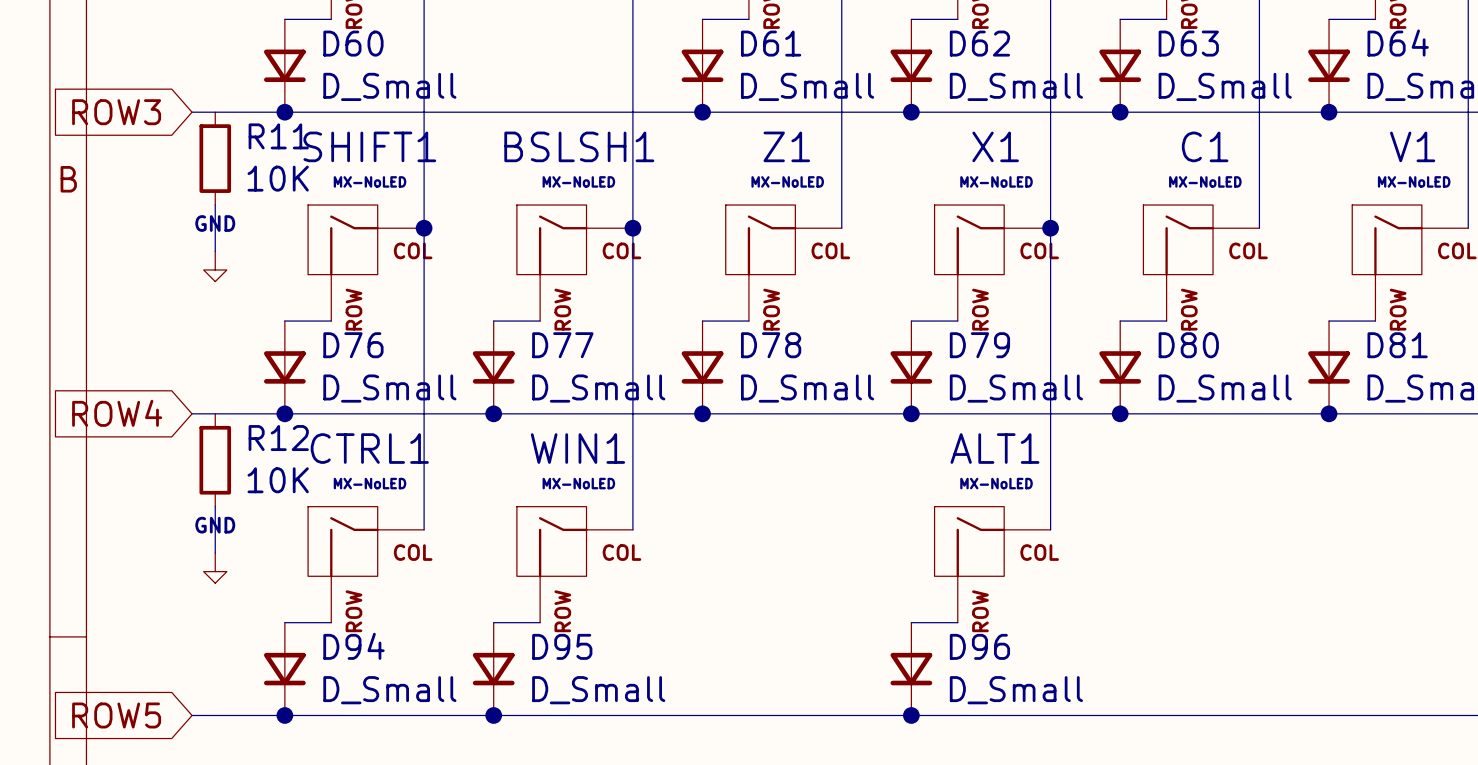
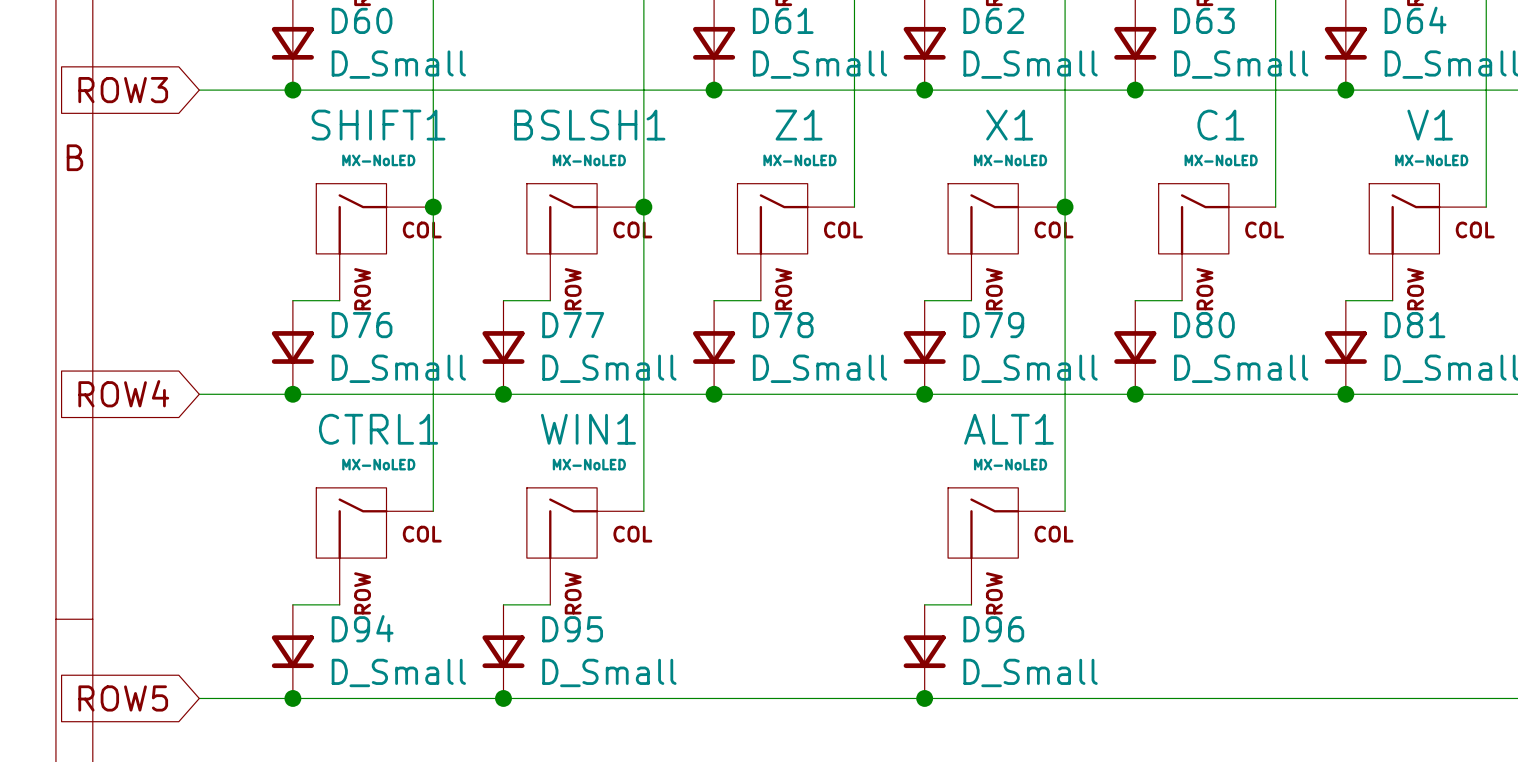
R11: 10K (215, 158) -> none
wire: (215, 205) (215, 251) -> none
power symbol: GND (215, 266) -> none
R12: 10K (215, 460) -> none
wire: (215, 506) (215, 553) -> none
power symbol: GND (215, 568) -> none

